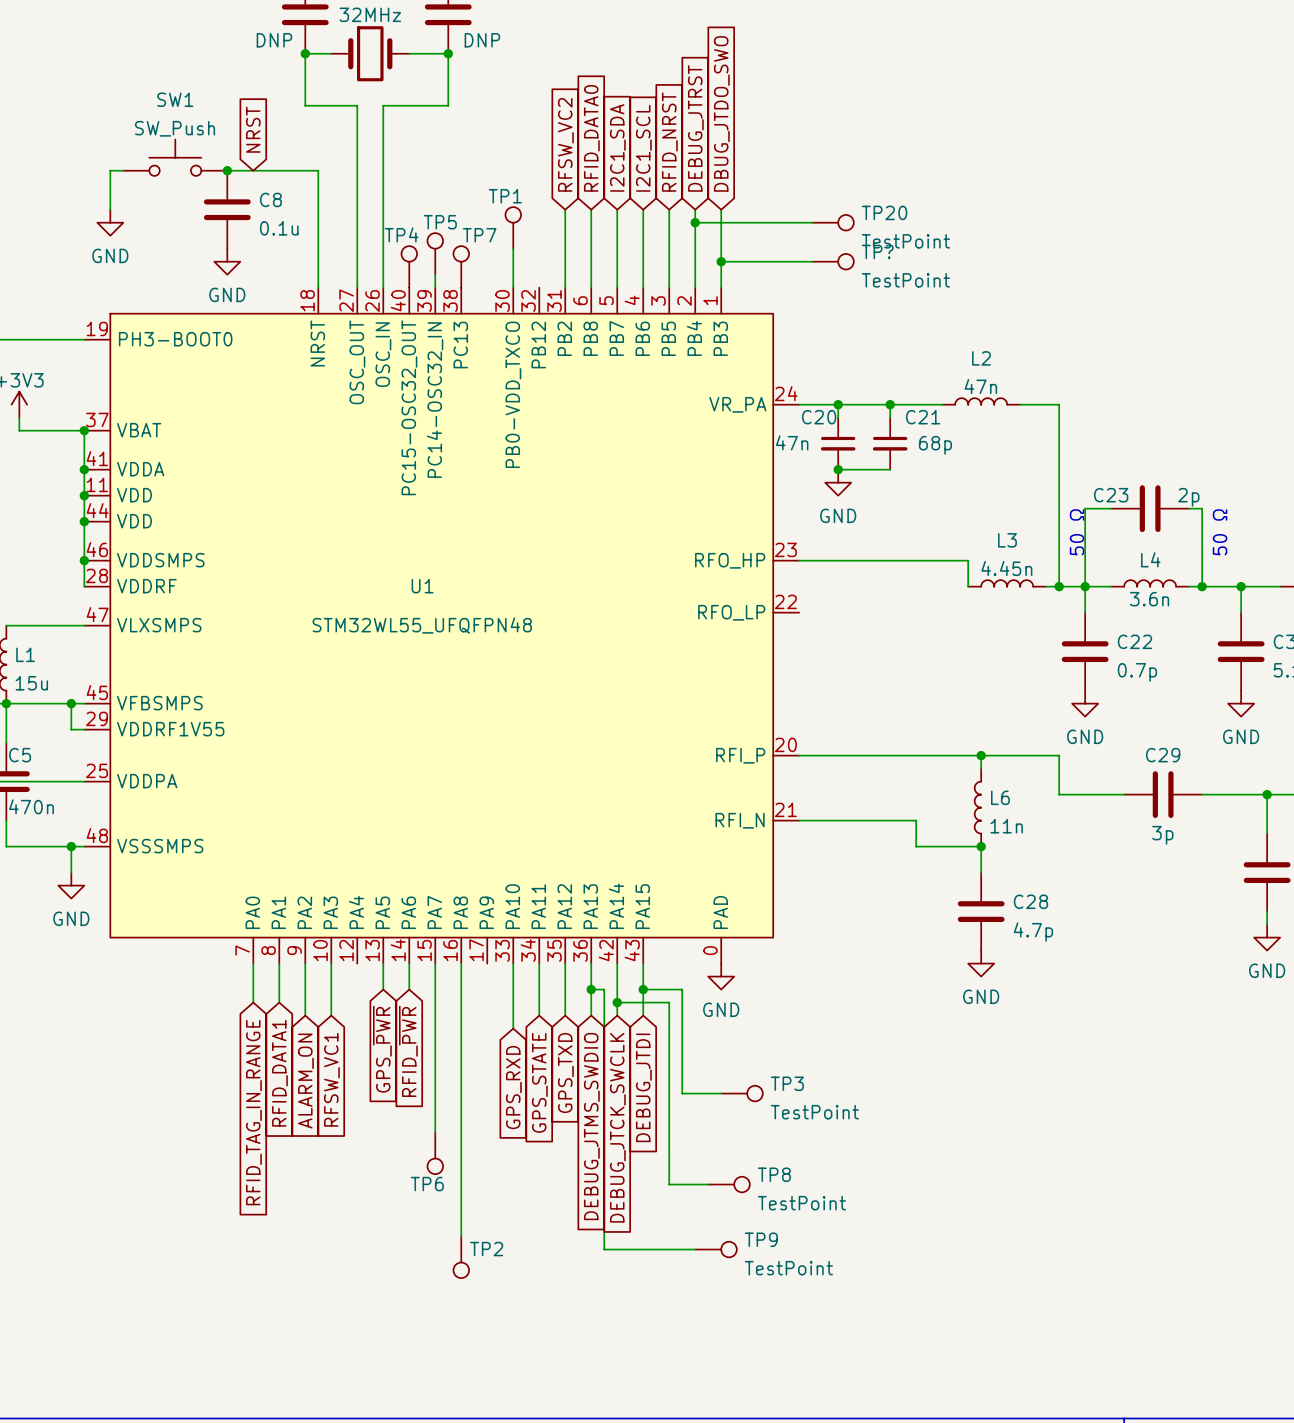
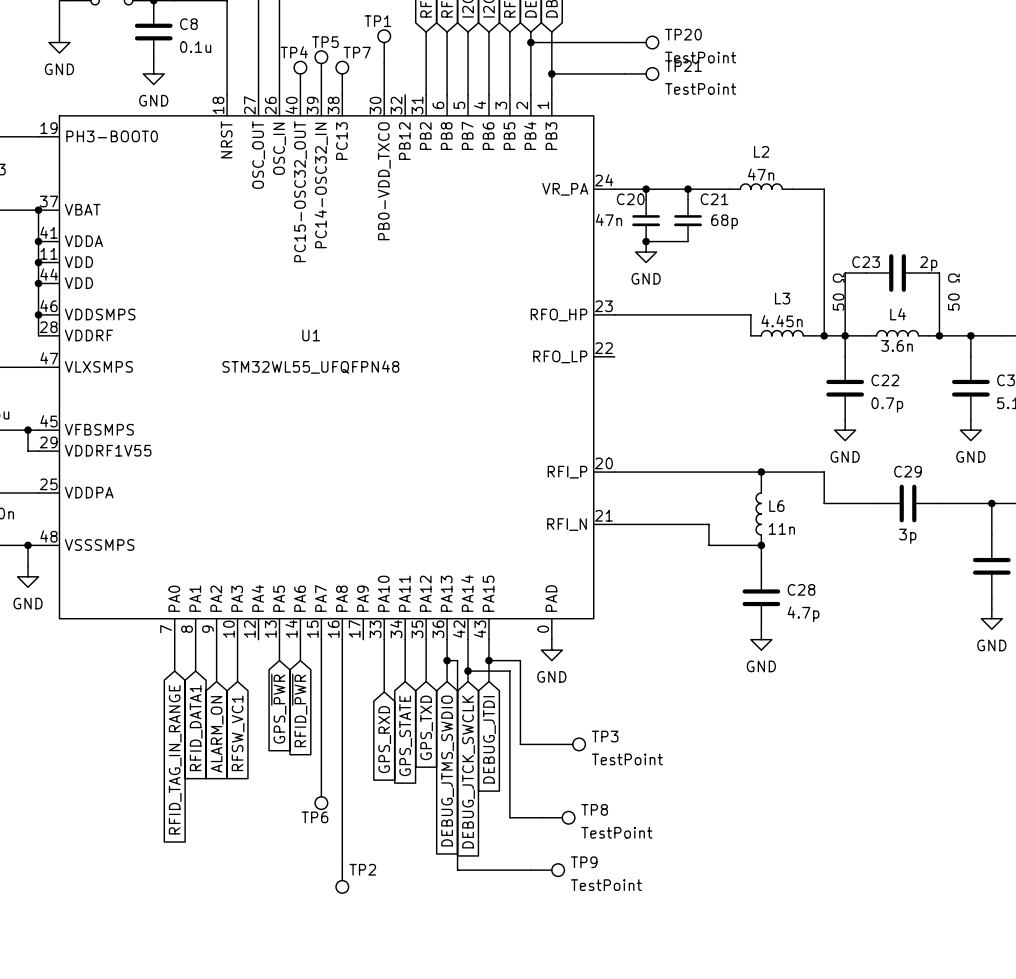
TP? name: TP? (877, 251) -> TP21 (683, 66)

